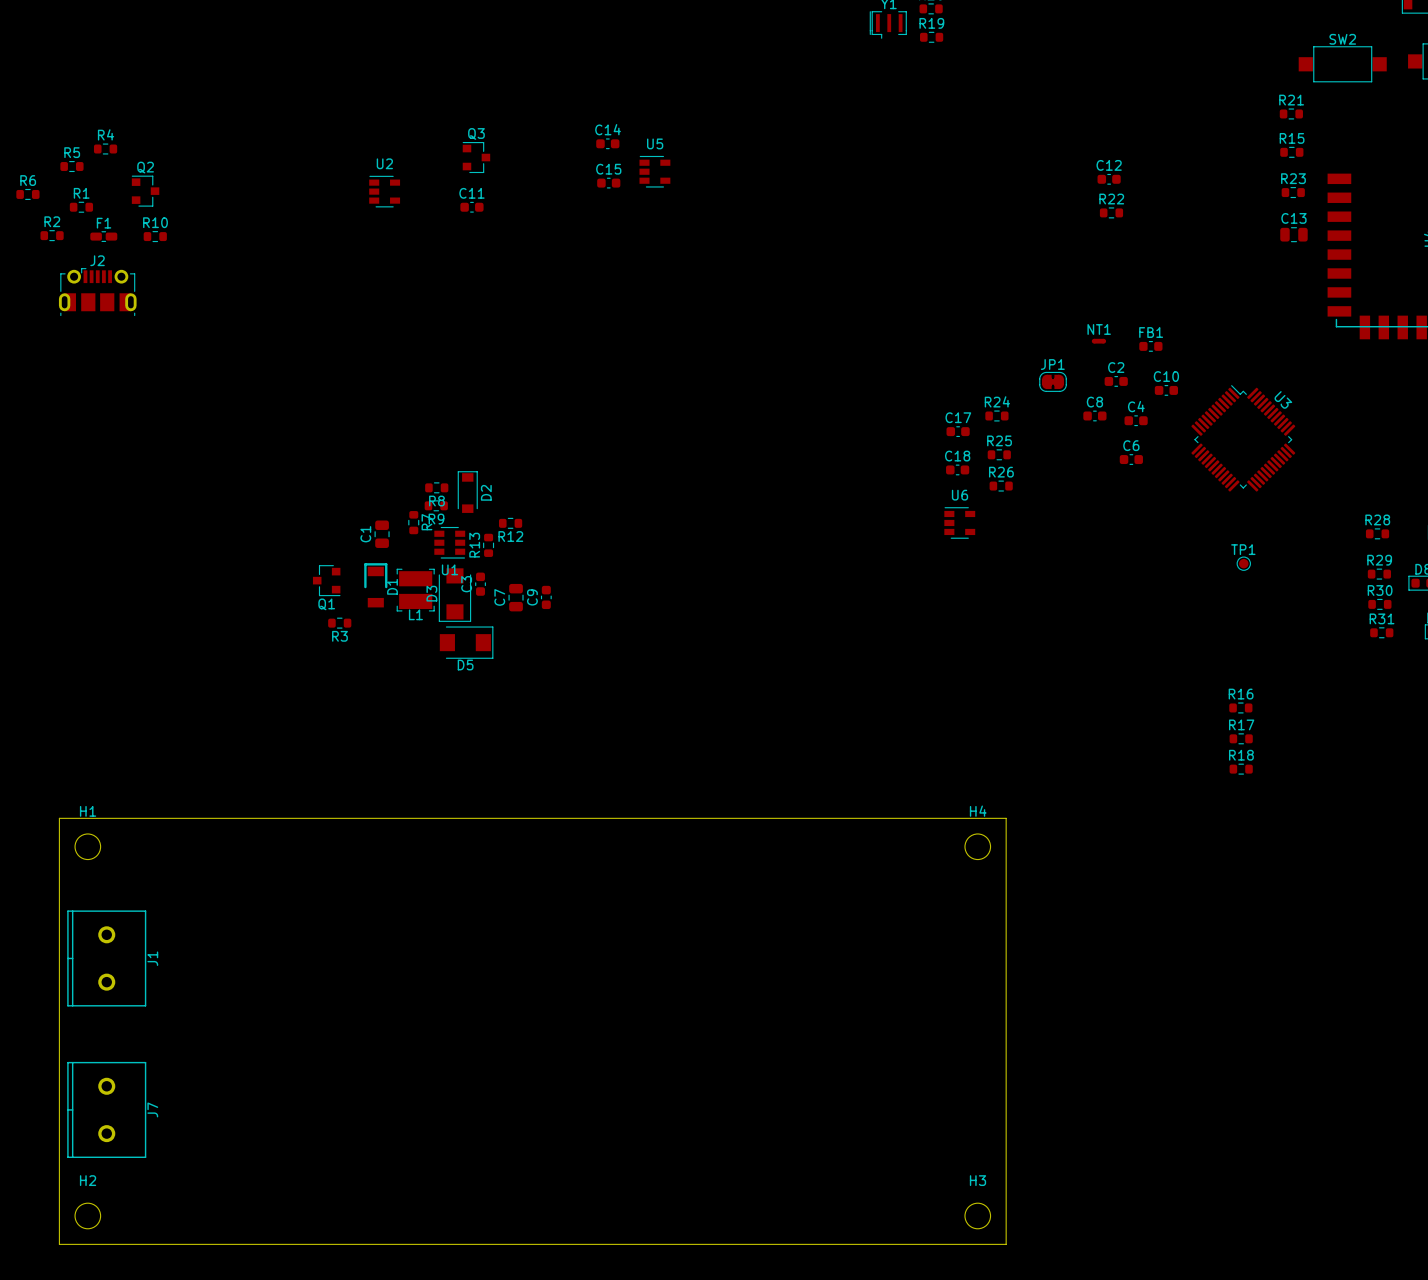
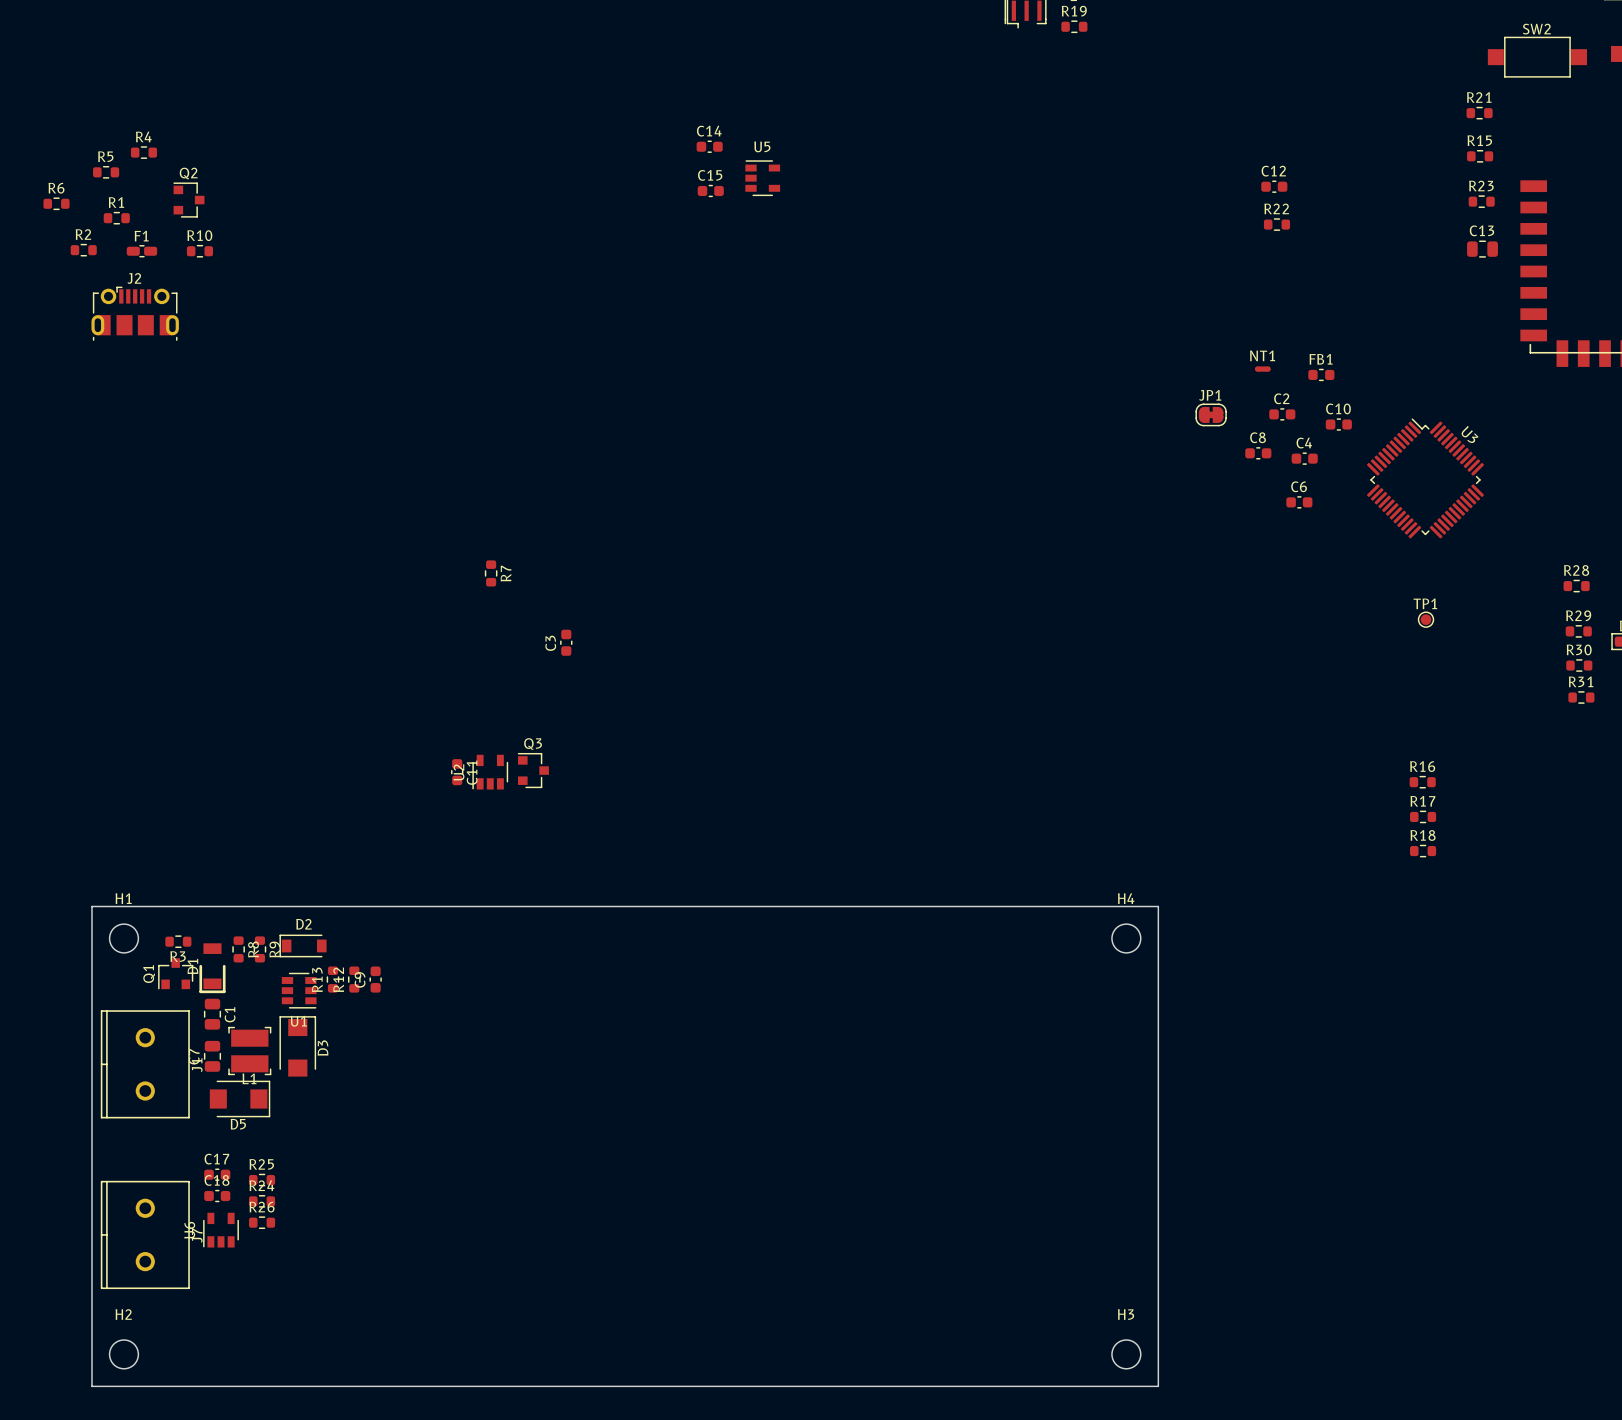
Q3 position: (476, 157) -> (533, 770)
U2 rotation: 0° (384, 191) -> 90° counterclockwise (490, 772)
U2 position: (384, 191) -> (490, 772)
C11 rotation: 0° (471, 207) -> 90° clockwise (457, 772)
C11 position: (471, 207) -> (457, 772)
R24 position: (996, 415) -> (262, 1201)
C17 position: (958, 431) -> (217, 1174)
R25 position: (999, 454) -> (262, 1180)
C18 position: (957, 469) -> (217, 1196)
R26 position: (1001, 486) -> (262, 1222)
R8 rotation: 0° (436, 487) -> 90° clockwise (238, 949)
R8 position: (436, 487) -> (238, 949)
D2 rotation: 0° (467, 492) -> 90° counterclockwise (303, 945)
D2 position: (467, 492) -> (303, 945)
R8 name position: R8 (436, 501) -> R8 (253, 949)
R9 rotation: 0° (436, 505) -> 90° clockwise (259, 949)
R9 position: (436, 505) -> (259, 949)
R9 name position: R9 (436, 519) -> R9 (274, 949)
U6 rotation: 0° (959, 522) -> 90° counterclockwise (221, 1230)
U6 position: (959, 522) -> (221, 1230)
R12 rotation: 0° (510, 523) -> 90° clockwise (354, 979)
R12 position: (510, 523) -> (354, 979)
C1 name position: C1 (365, 534) -> C1 (230, 1014)
C1 position: (382, 534) -> (212, 1014)
U1 position: (449, 542) -> (299, 990)
R13 position: (488, 545) -> (332, 979)
Q1 rotation: 0° (326, 580) -> 90° clockwise (175, 973)
Q1 position: (326, 580) -> (175, 973)
D1 rotation: 0° (375, 585) -> 180° (212, 968)
D1 position: (375, 585) -> (212, 968)
L1 position: (415, 590) -> (249, 1051)
D3 rotation: 0° (454, 595) -> 180° (297, 1046)
D3 position: (454, 595) -> (297, 1046)
C7 position: (516, 597) -> (212, 1056)
C9 position: (546, 597) -> (375, 979)
R3 position: (339, 623) -> (178, 941)
D5 position: (466, 642) -> (240, 1098)

